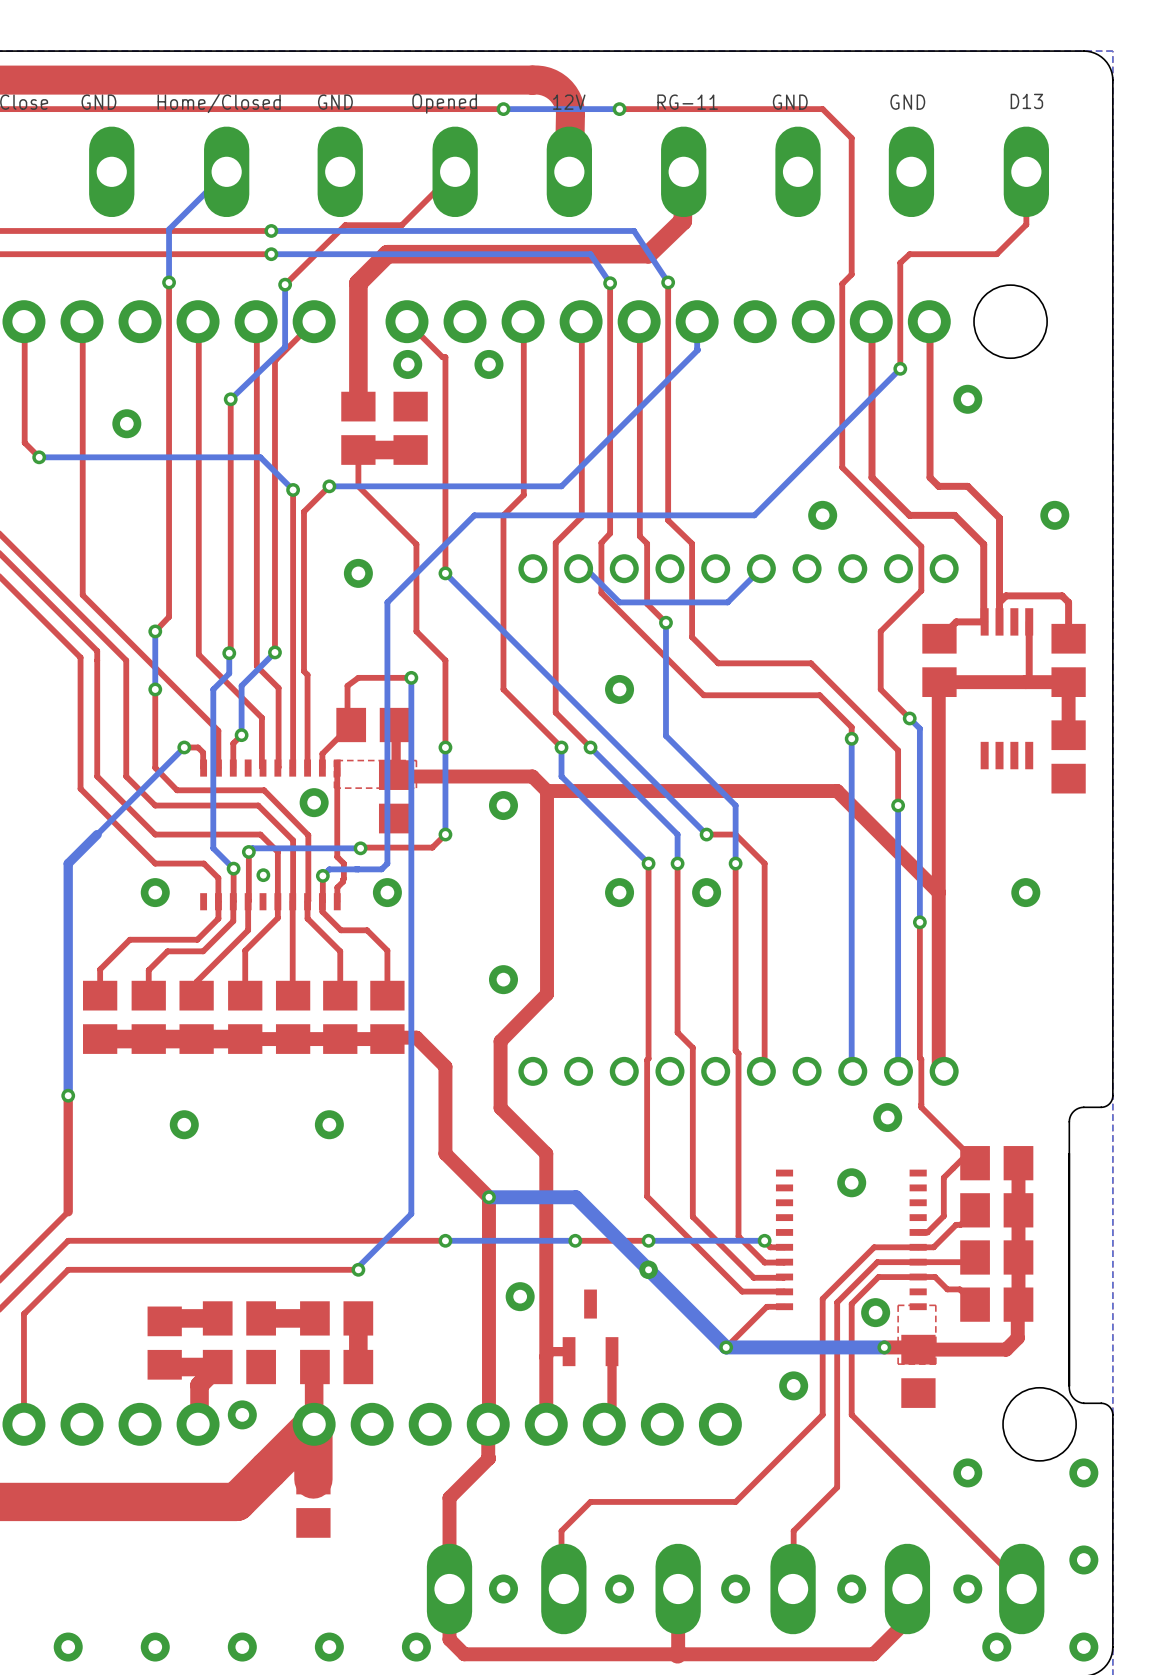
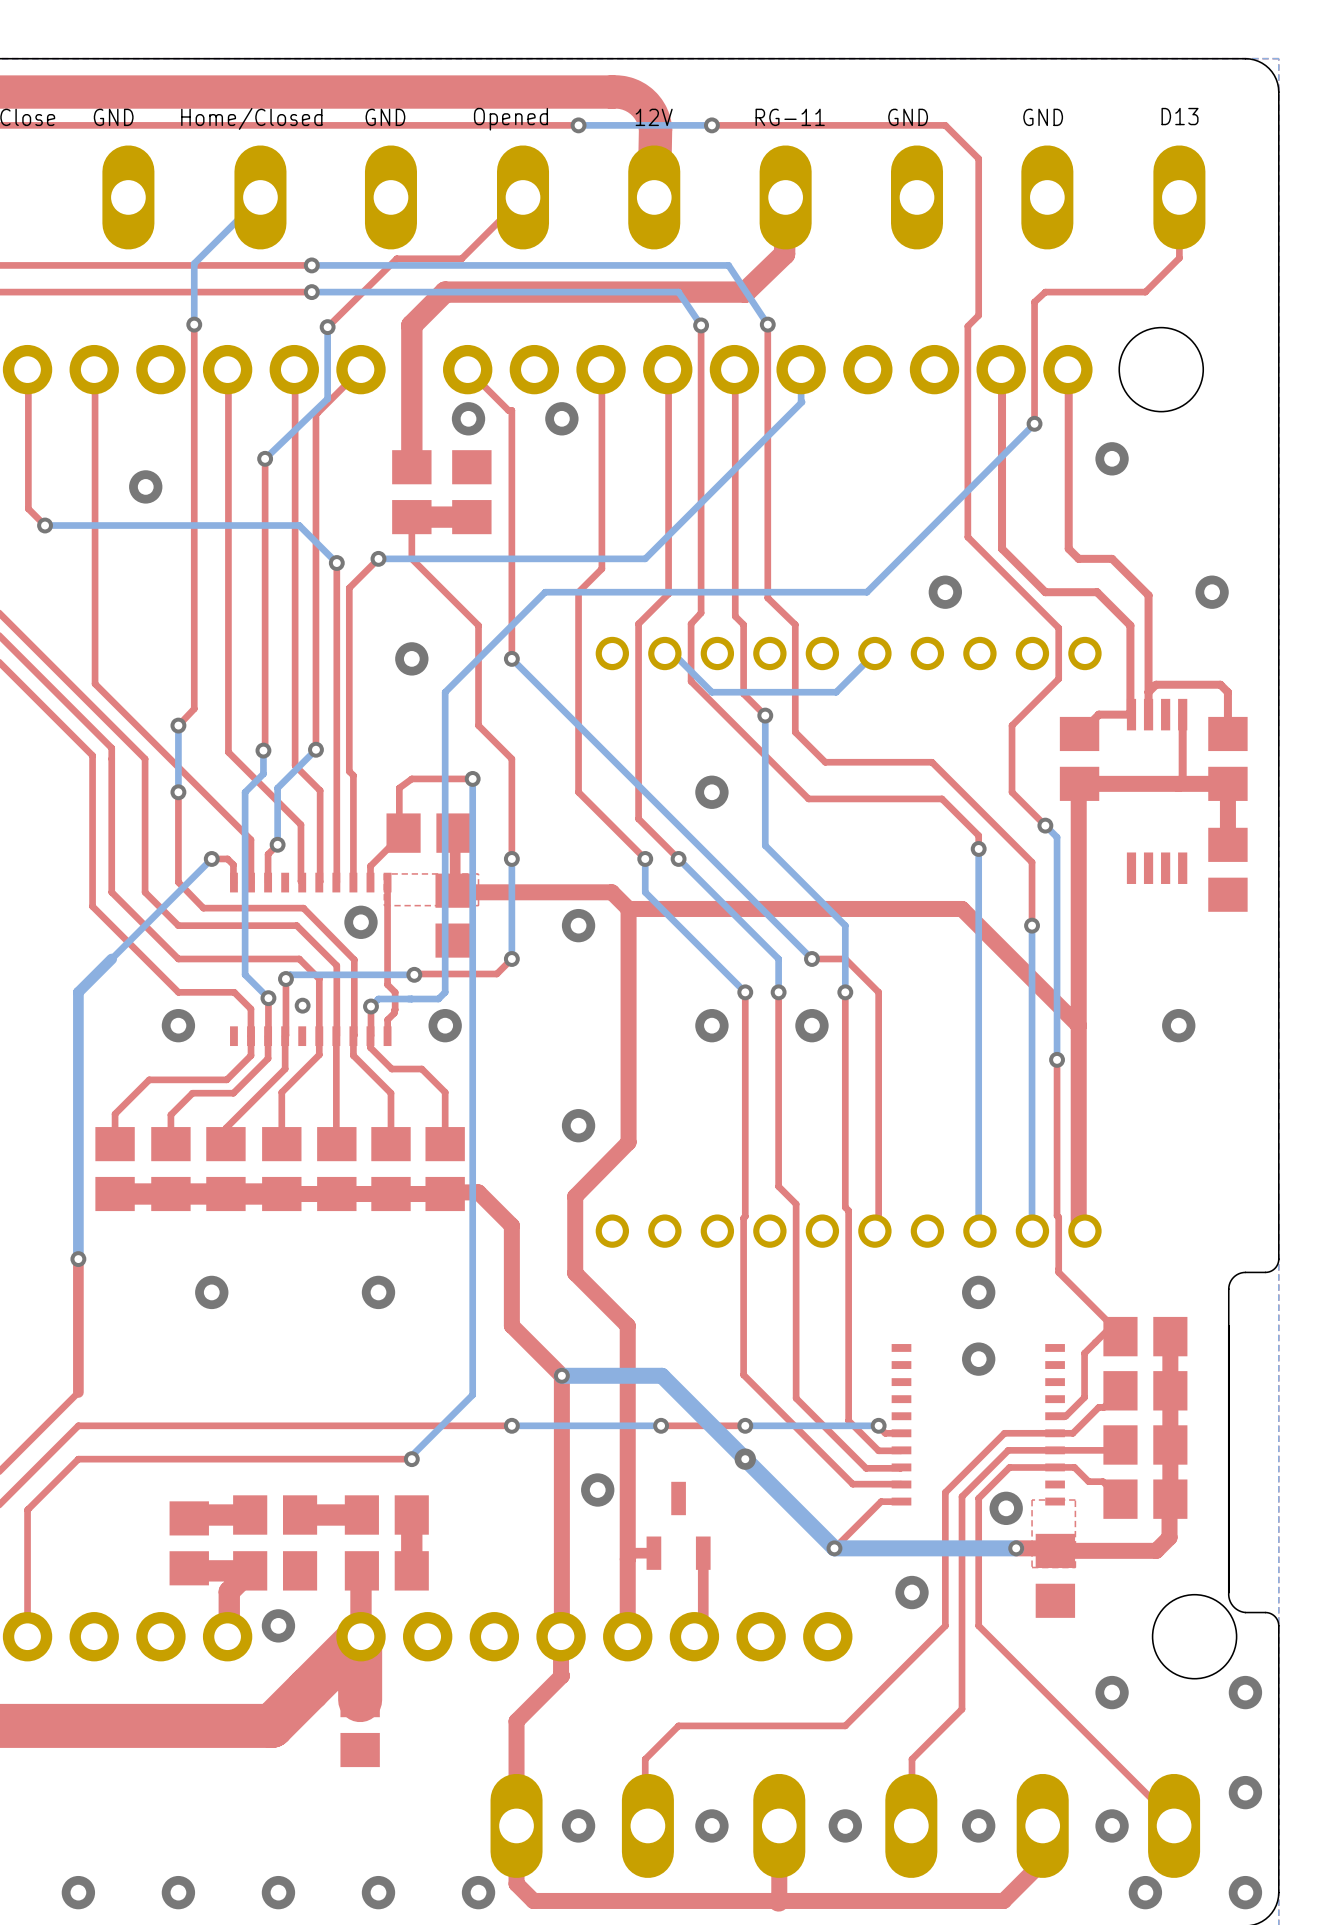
via position: (887, 1117) -> (978, 1292)

